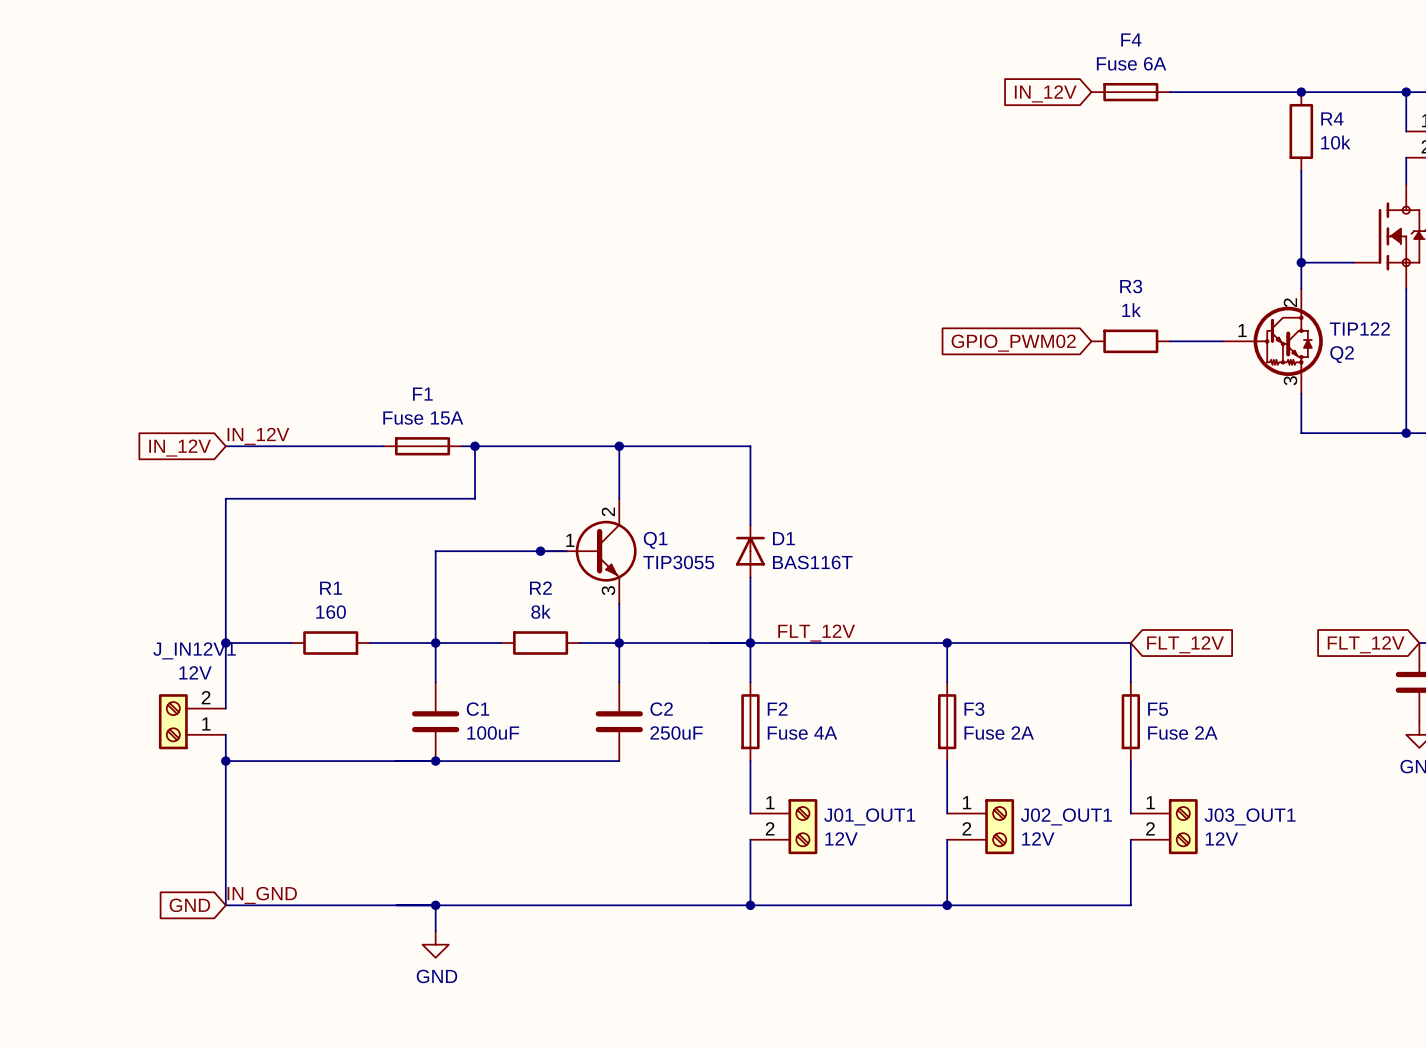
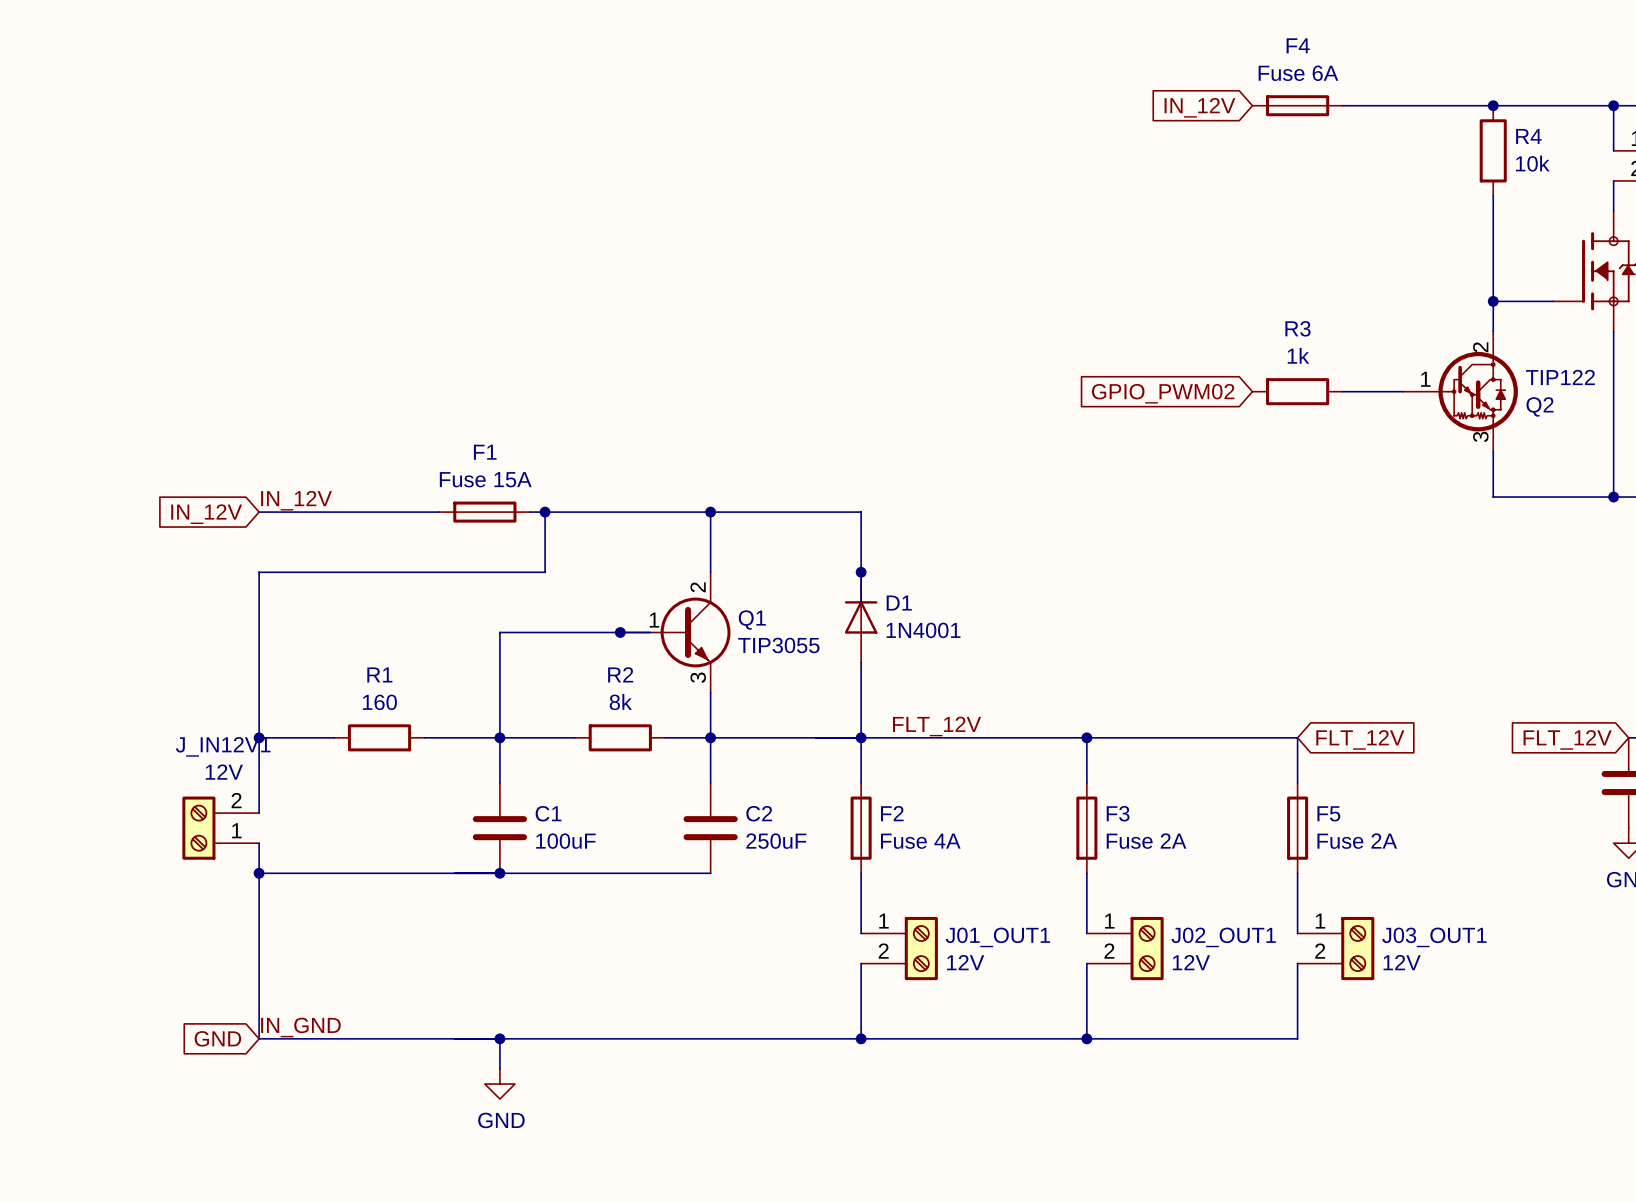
junction: none -> (861, 572)
D1 symbol: [736, 524, 765, 578] -> [844, 572, 878, 663]
D1 value: BAS116T (812, 562) -> 1N4001 (923, 630)

